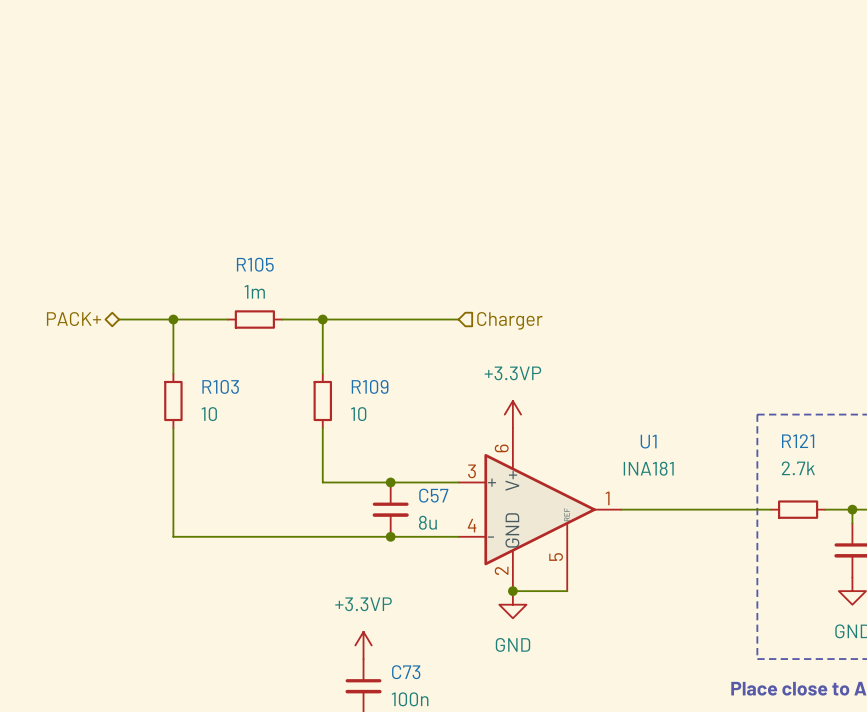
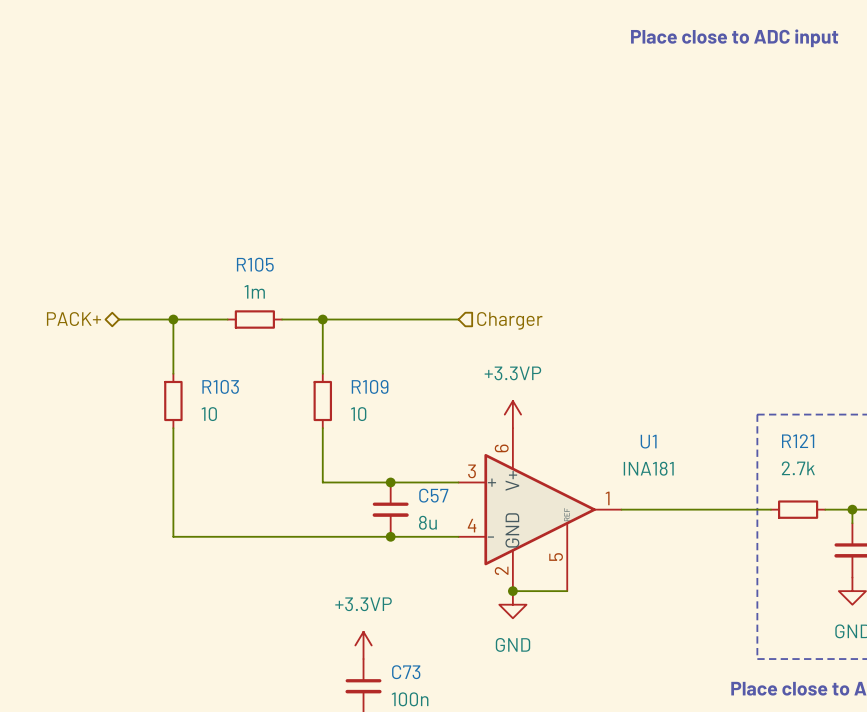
text: none -> Place close to ADC input (734, 38)

